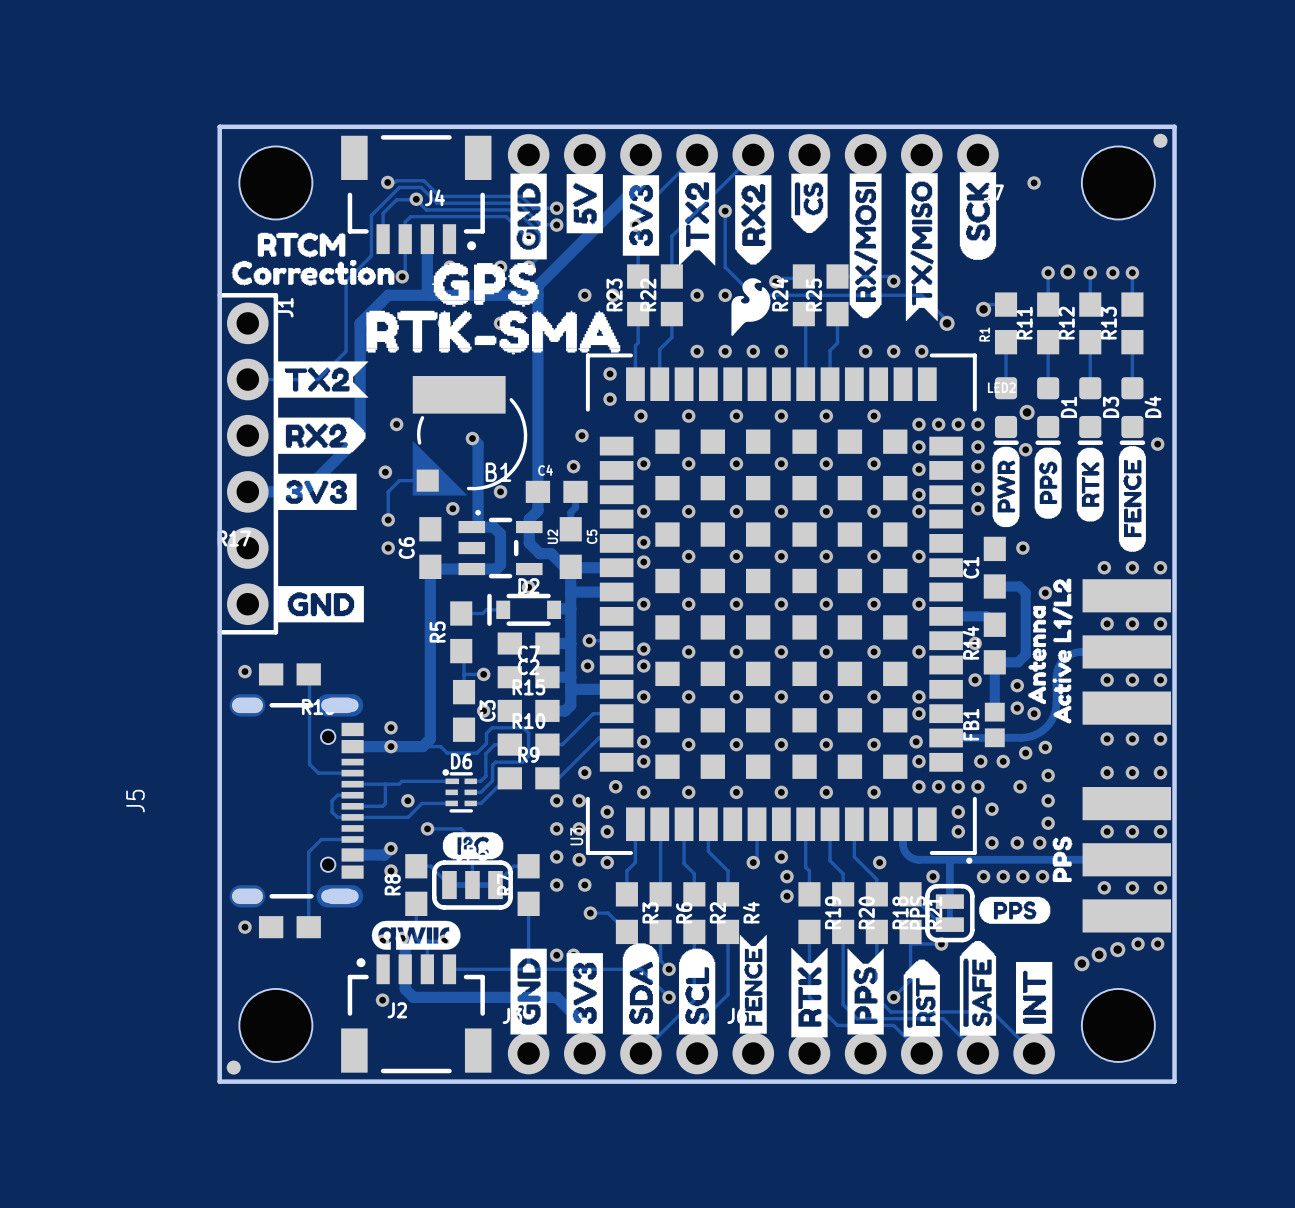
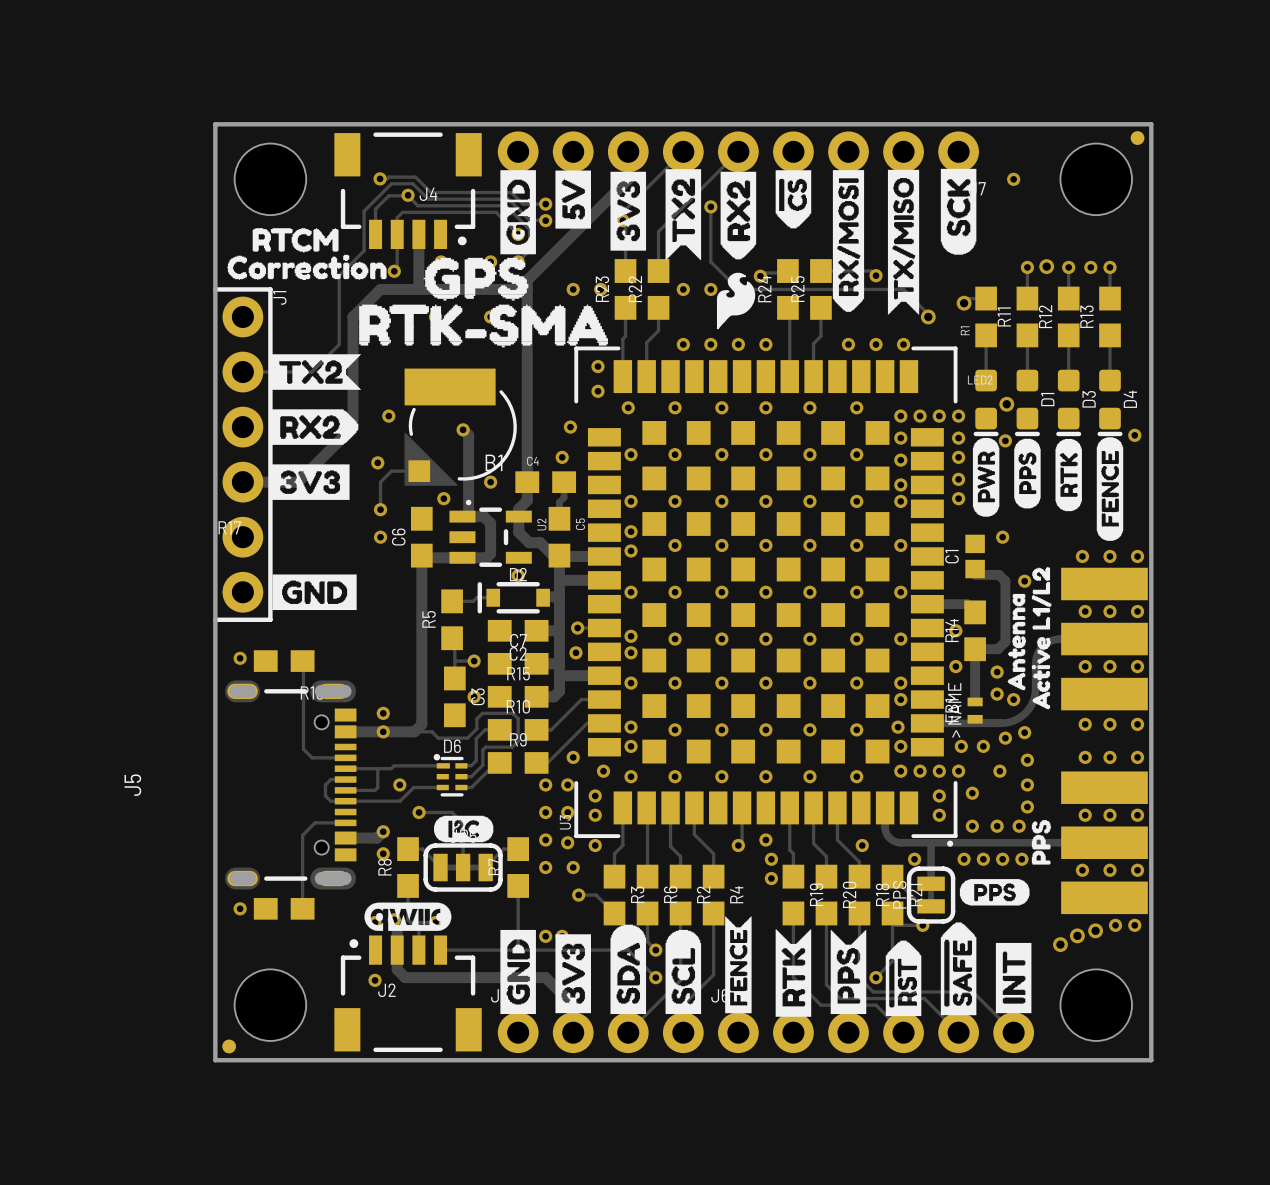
C1 footprint: [983, 536, 1006, 599] -> [965, 534, 985, 579]
FB1 footprint: [984, 702, 1005, 748] -> [967, 697, 983, 724]

